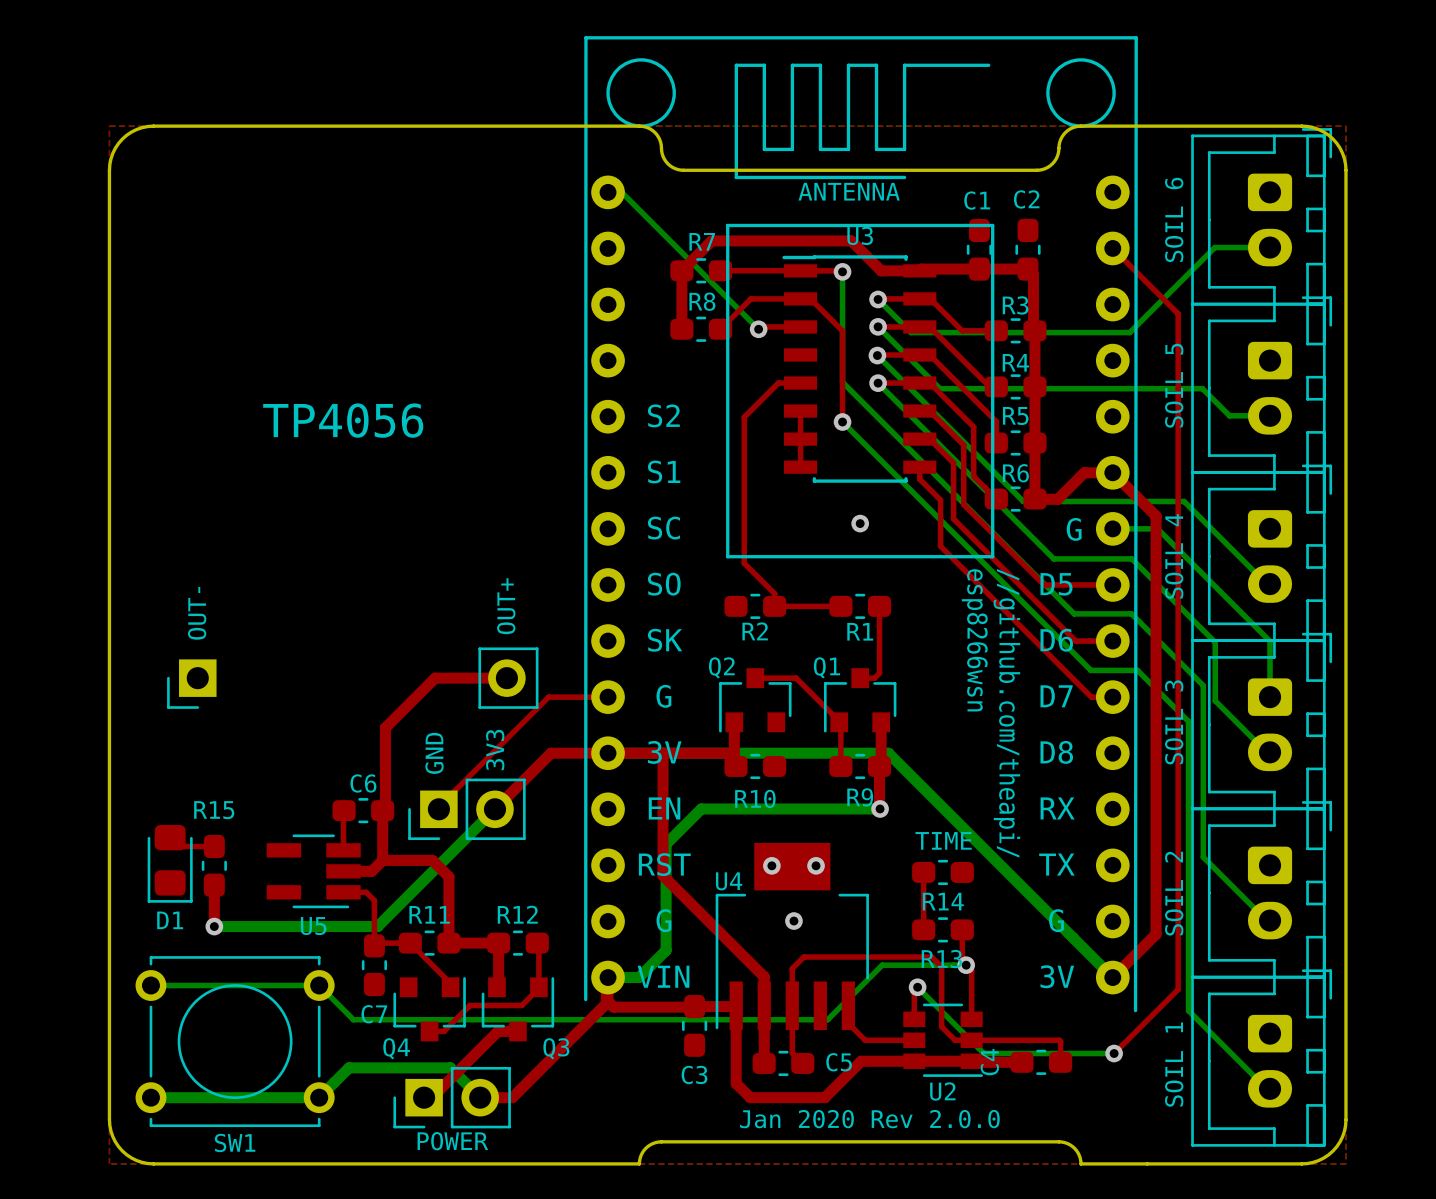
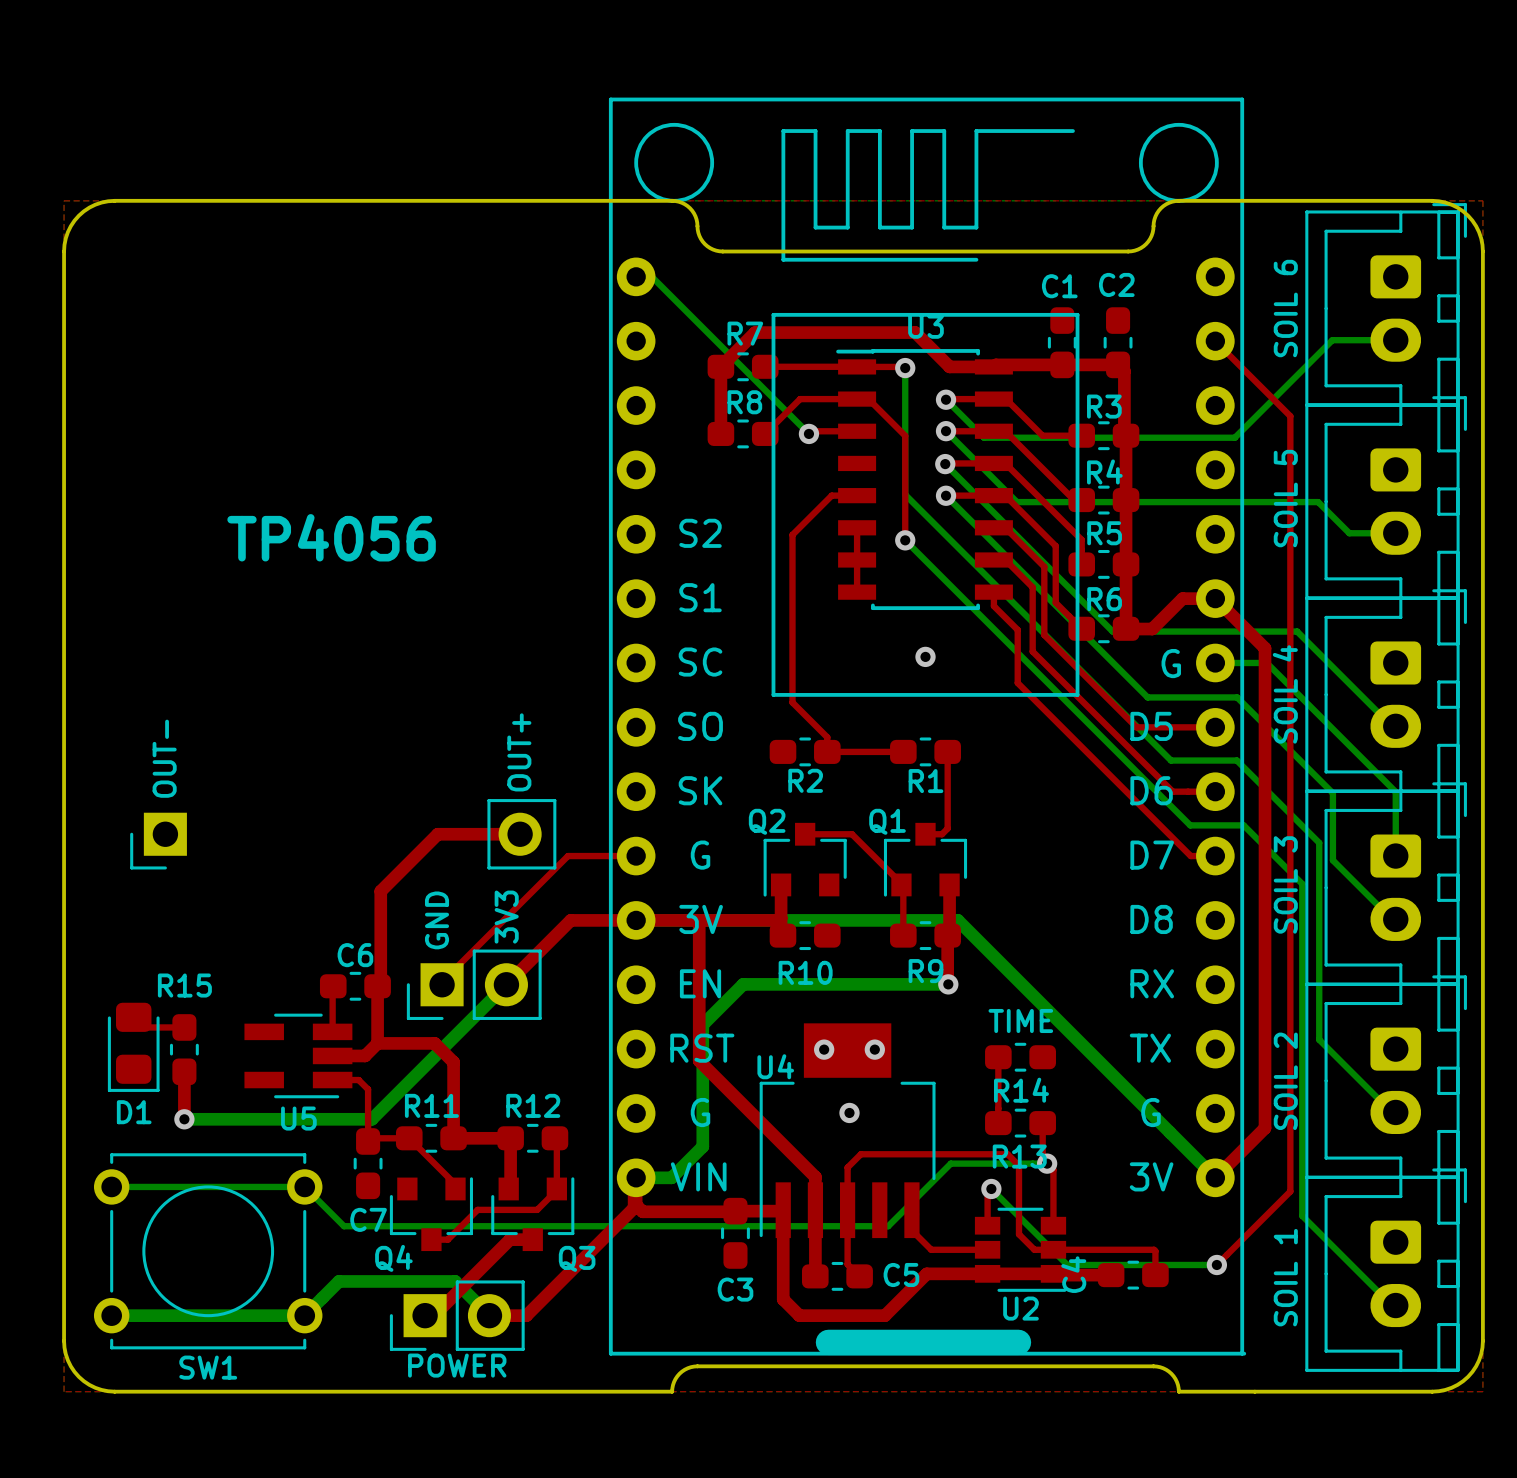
text: ANTENNA (849, 191) -> none
part: (860, 524) -> none
part: none -> (927, 726)
text: esp8266wsn (974, 640) -> none
text: //github.com/theapi/ (1006, 713) -> none
text: Jan 2020 Rev 2.0.0 (869, 1119) -> none

